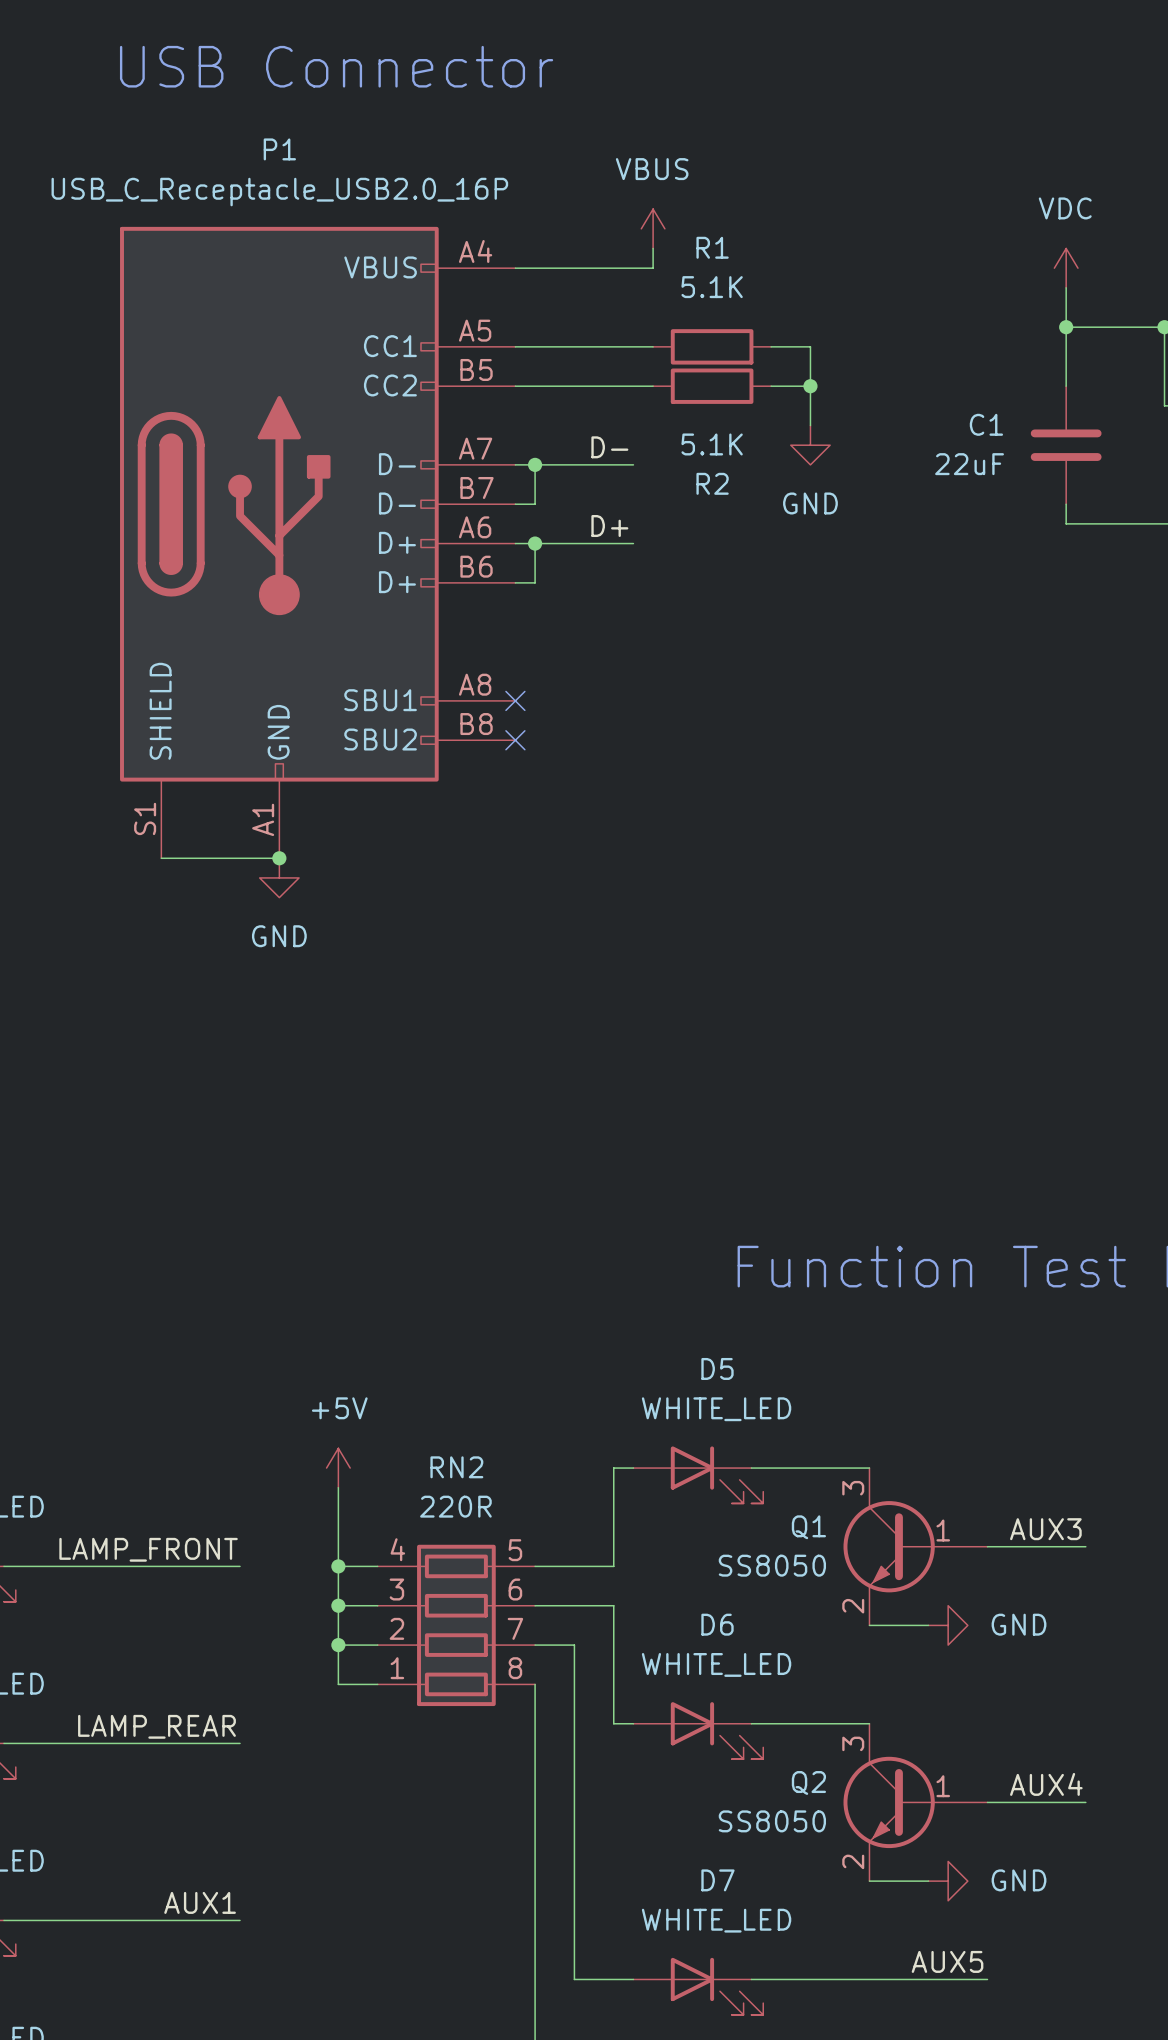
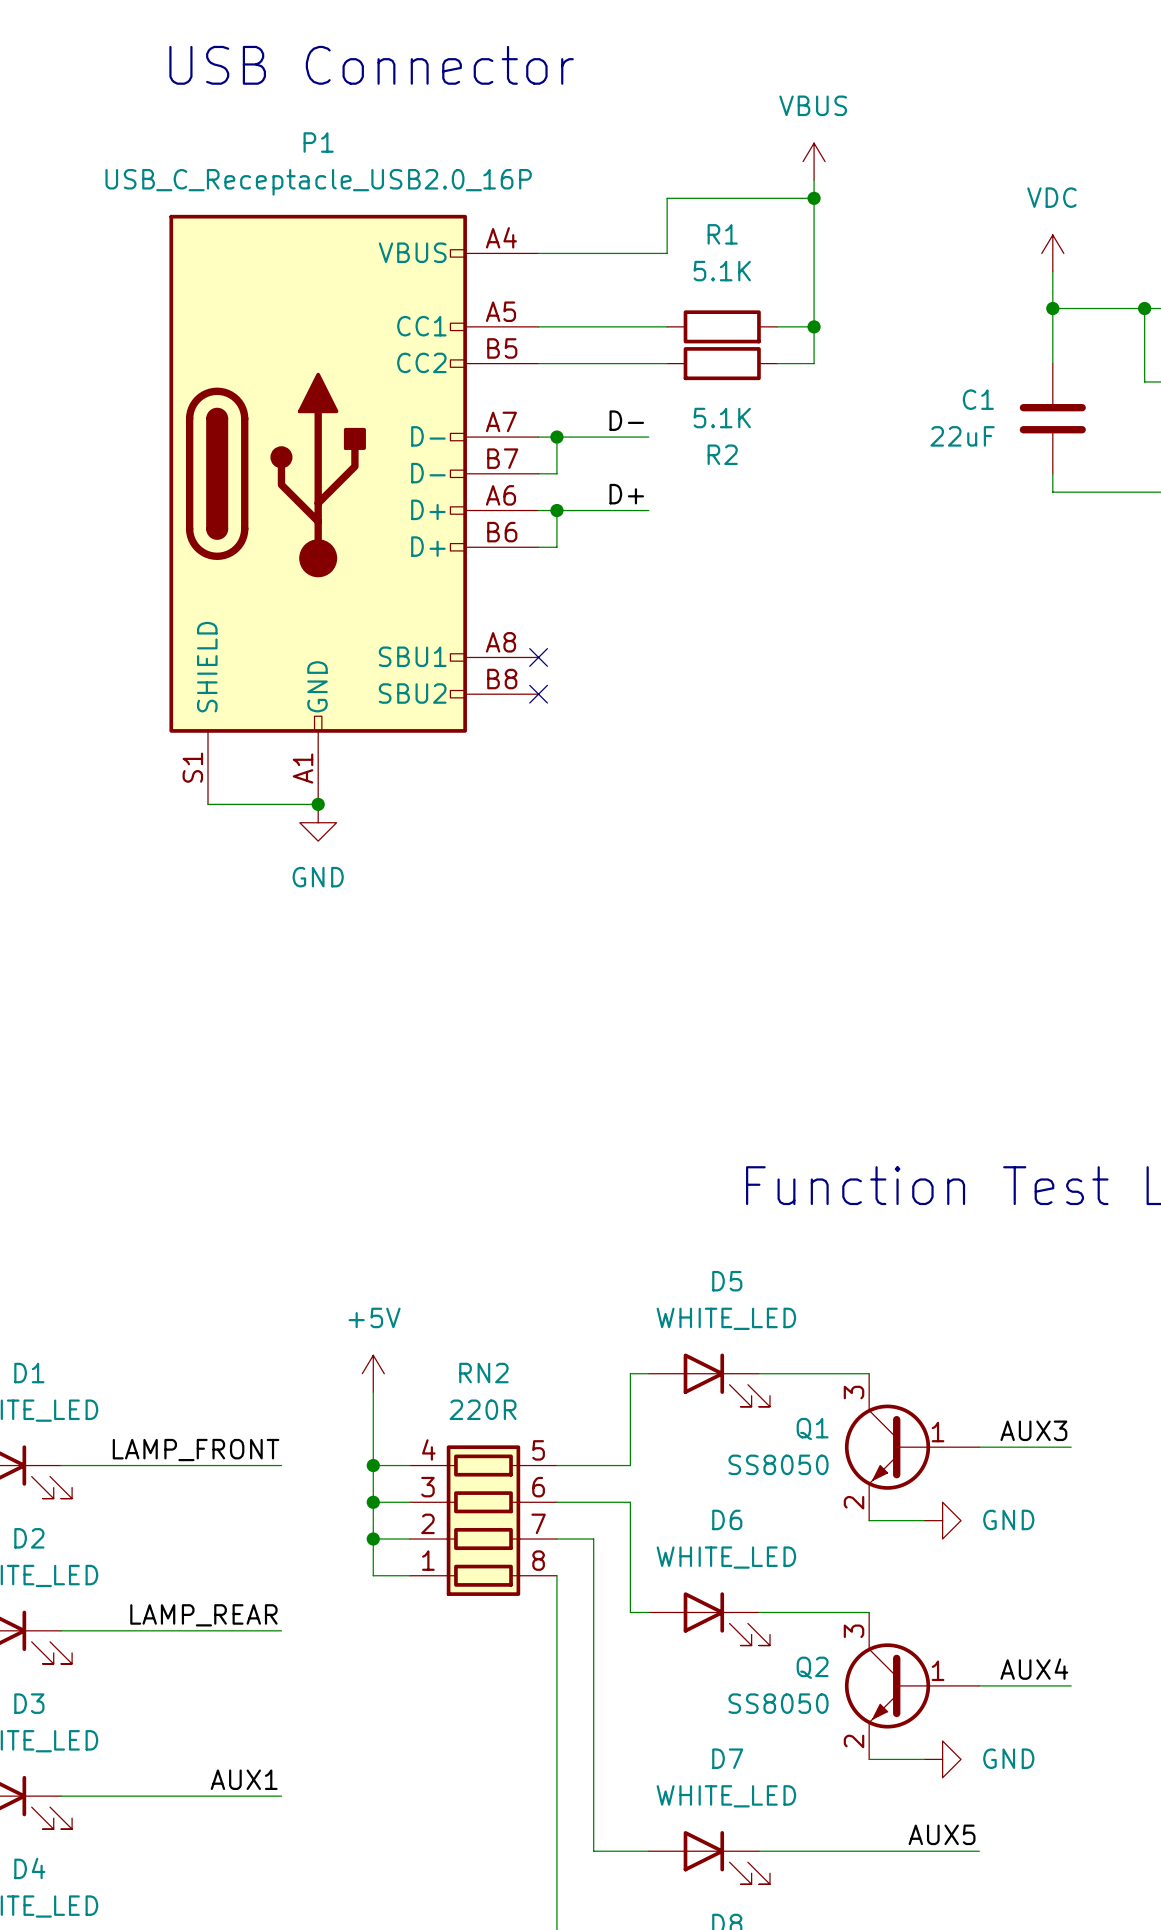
wire: none -> (814, 179) (814, 326)
wire: none -> (814, 198) (667, 198) (667, 235)
junction: none -> (814, 198)
power symbol position: VBUS (653, 228) -> VBUS (814, 161)
wire: (810, 386) (810, 425) -> none
junction position: (810, 386) -> (814, 326)
power symbol: GND (810, 445) -> none

